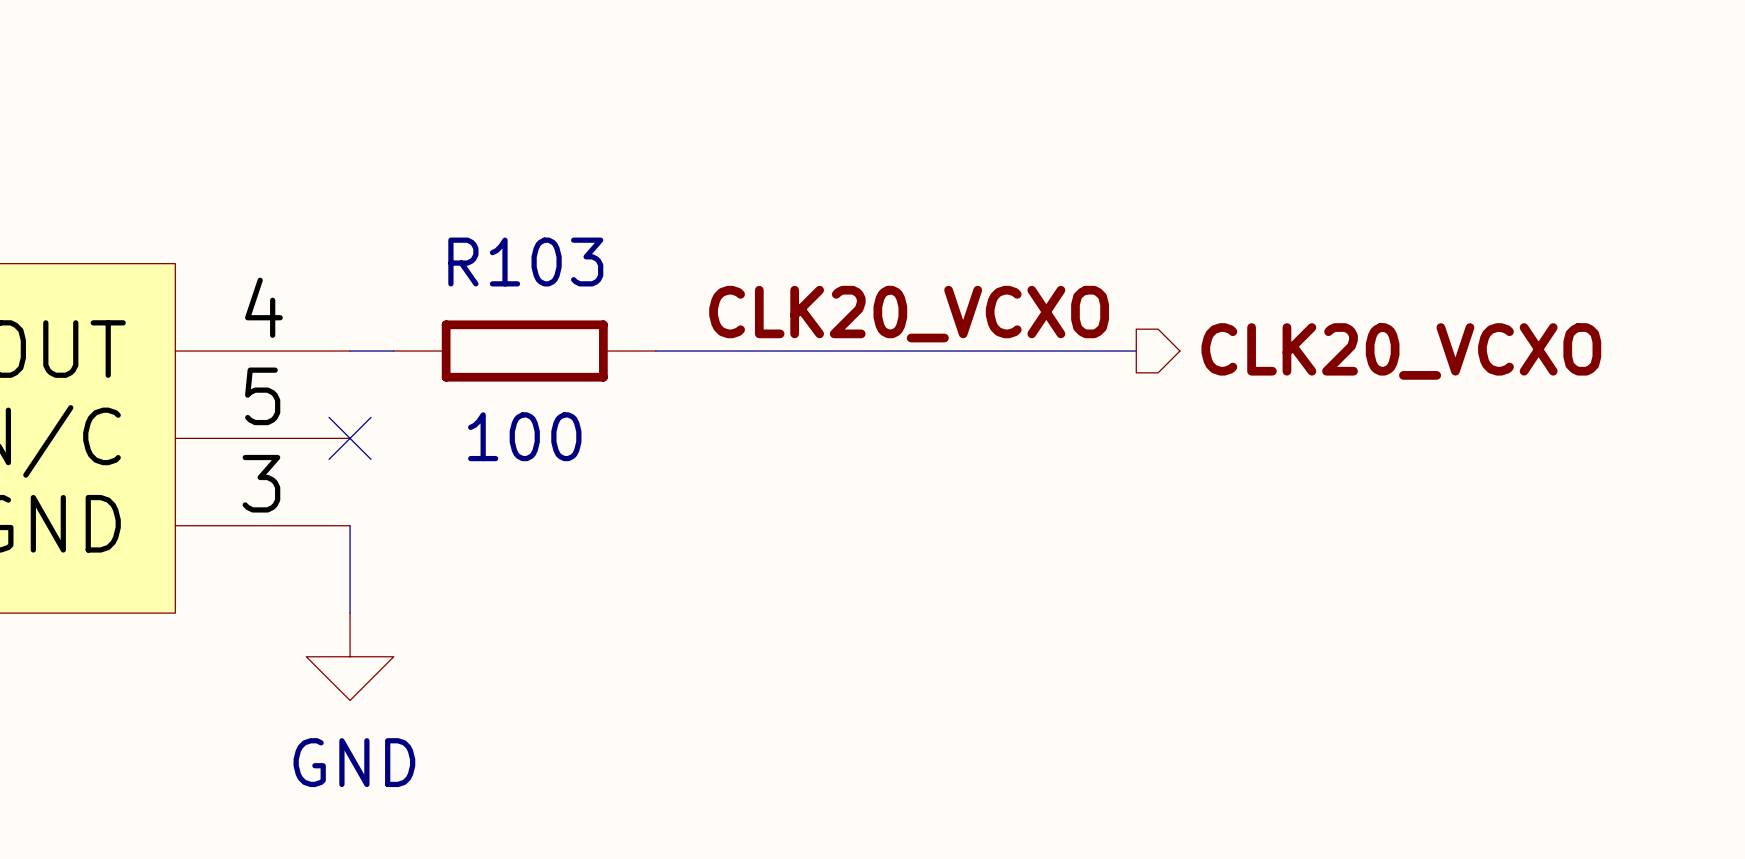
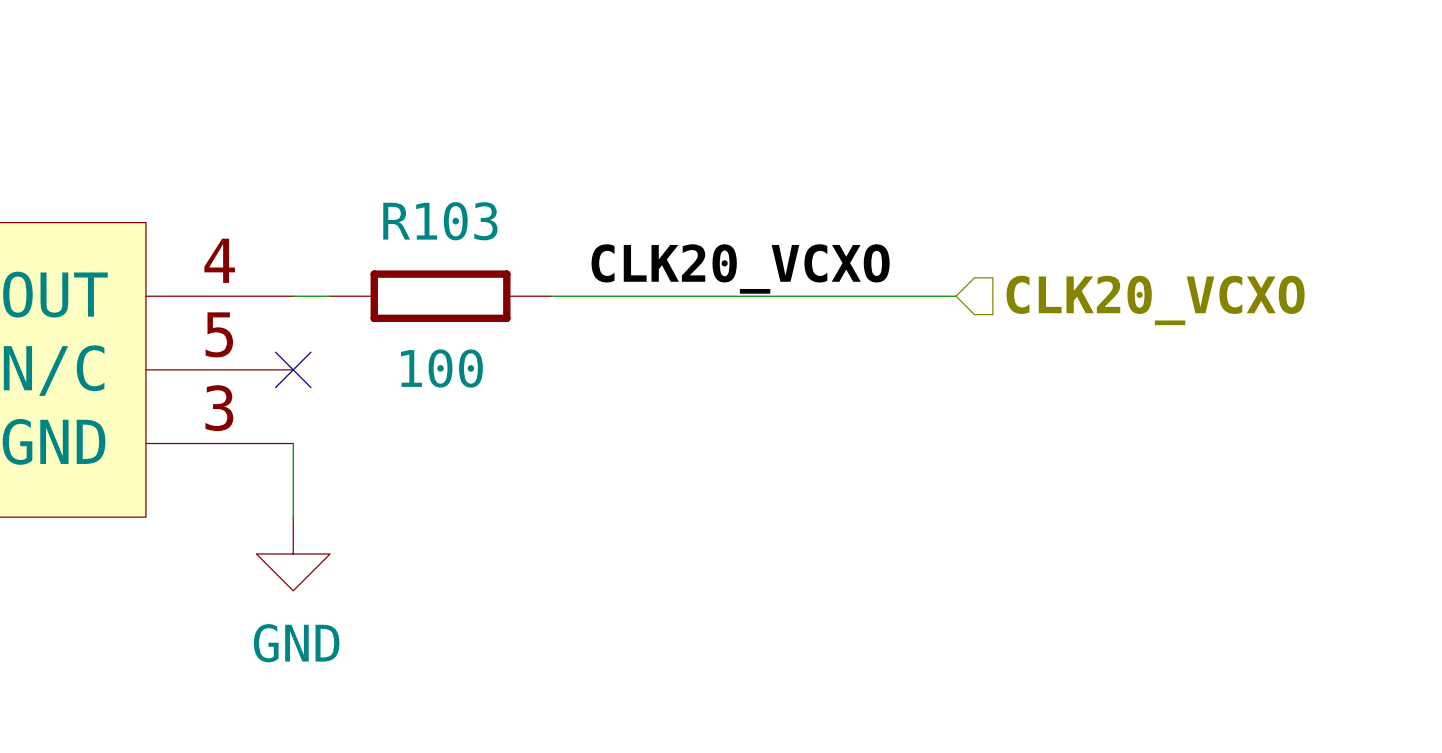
hierarchical label shape: output (1401, 351) -> input (1155, 300)

